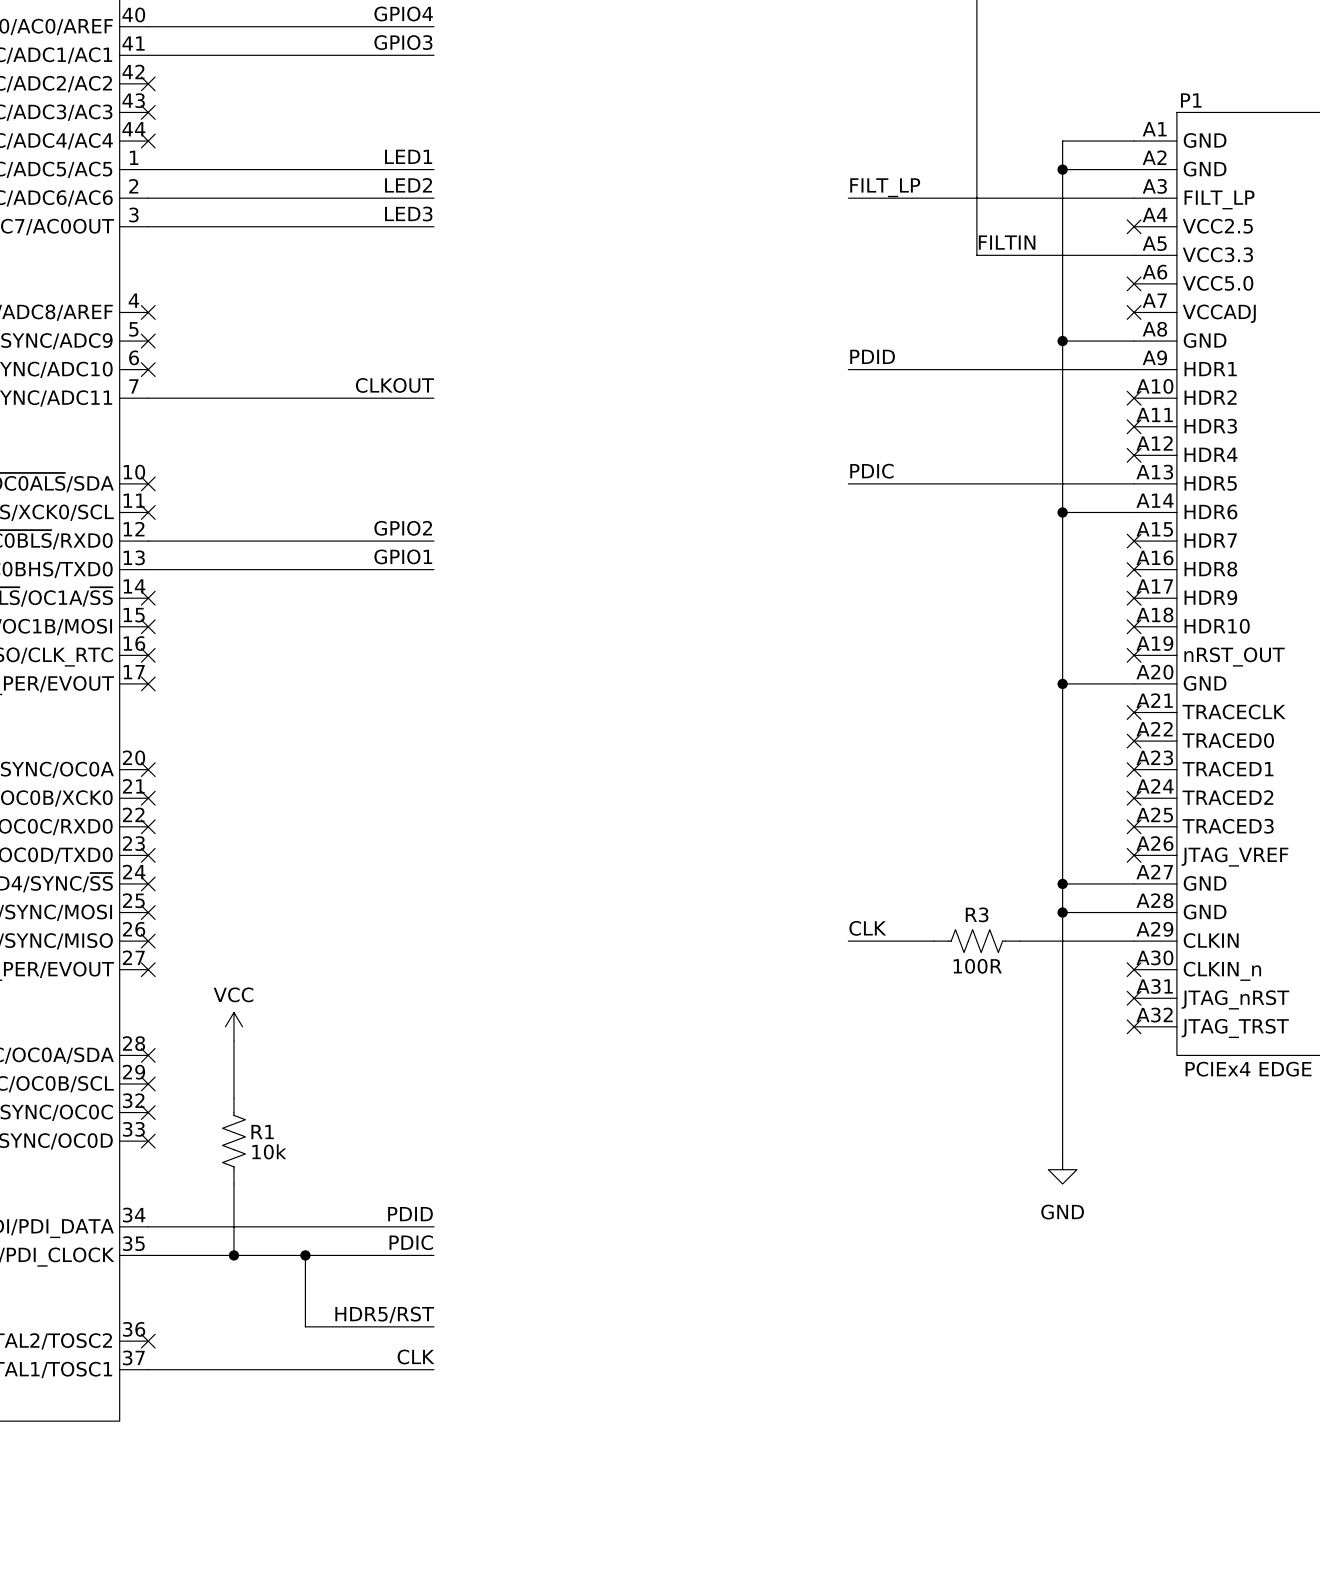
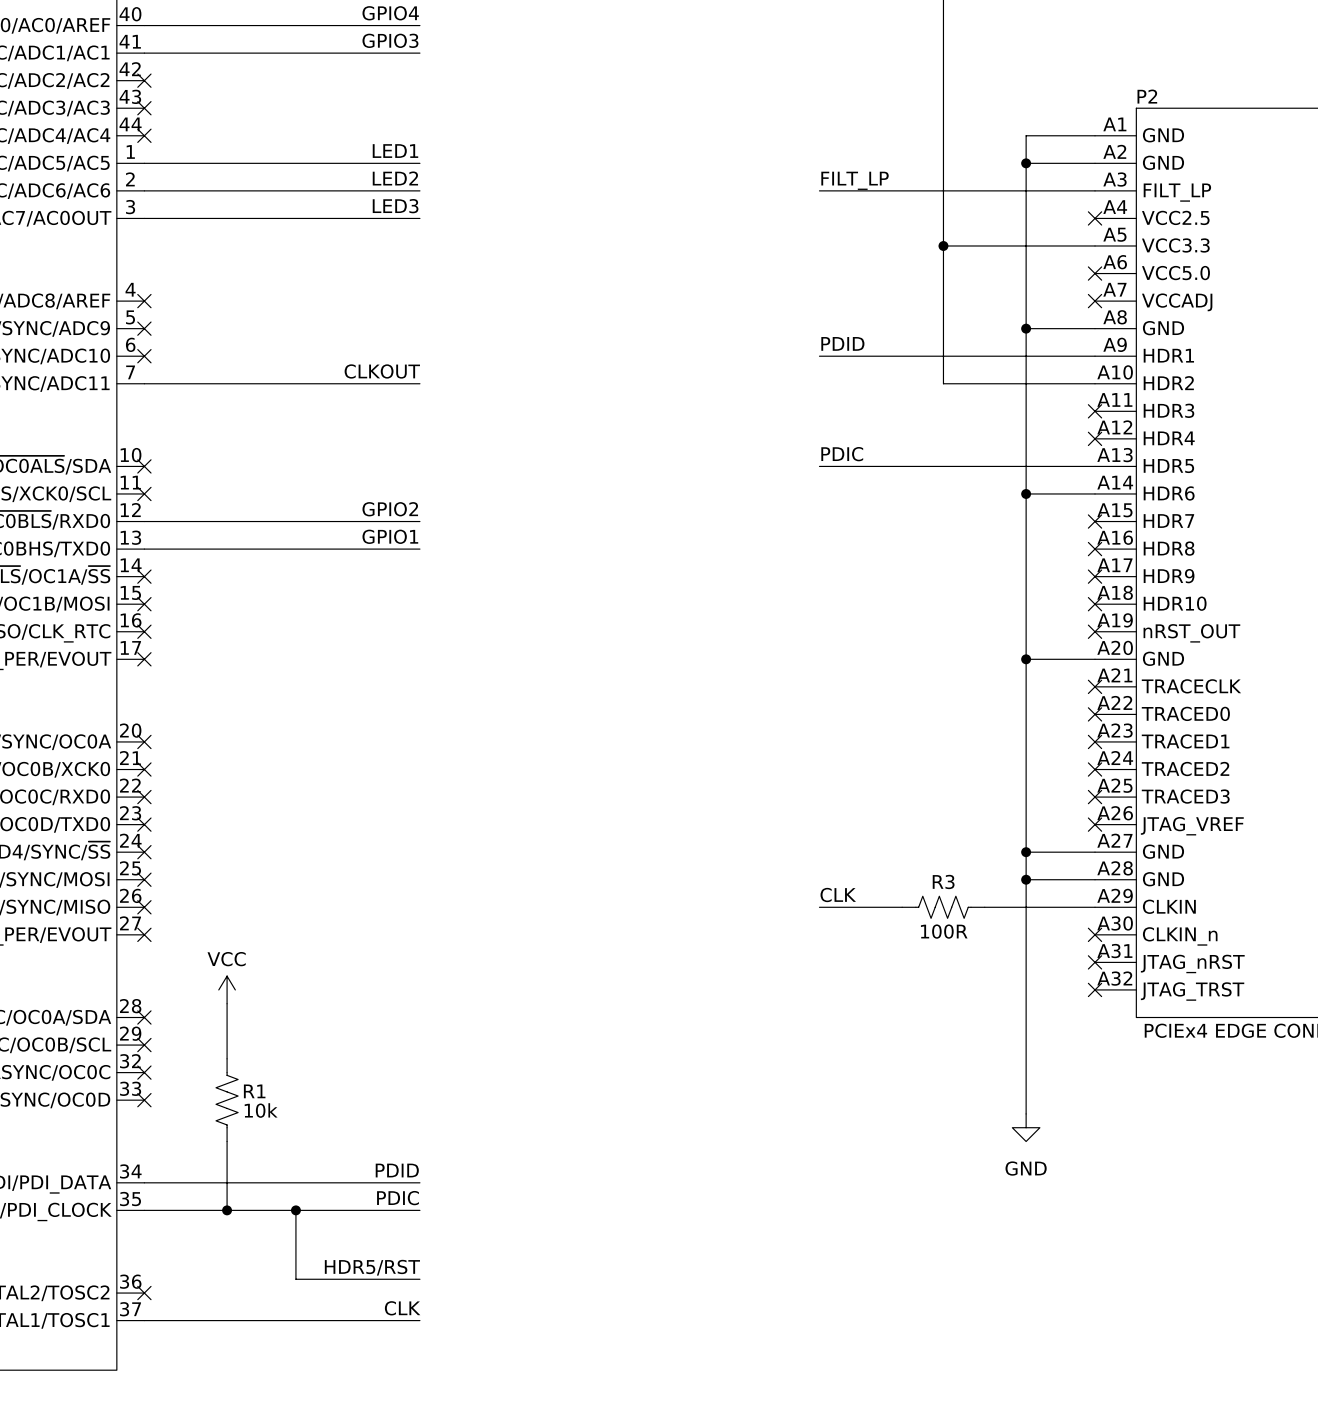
P1 name: P1 (1191, 100) -> P2 (1147, 96)
label: FILTIN (1007, 242) -> none
wire: none -> (943, 245) (943, 383) (1095, 383)
junction: none -> (943, 245)
no-connect mark: (1134, 398) -> none

